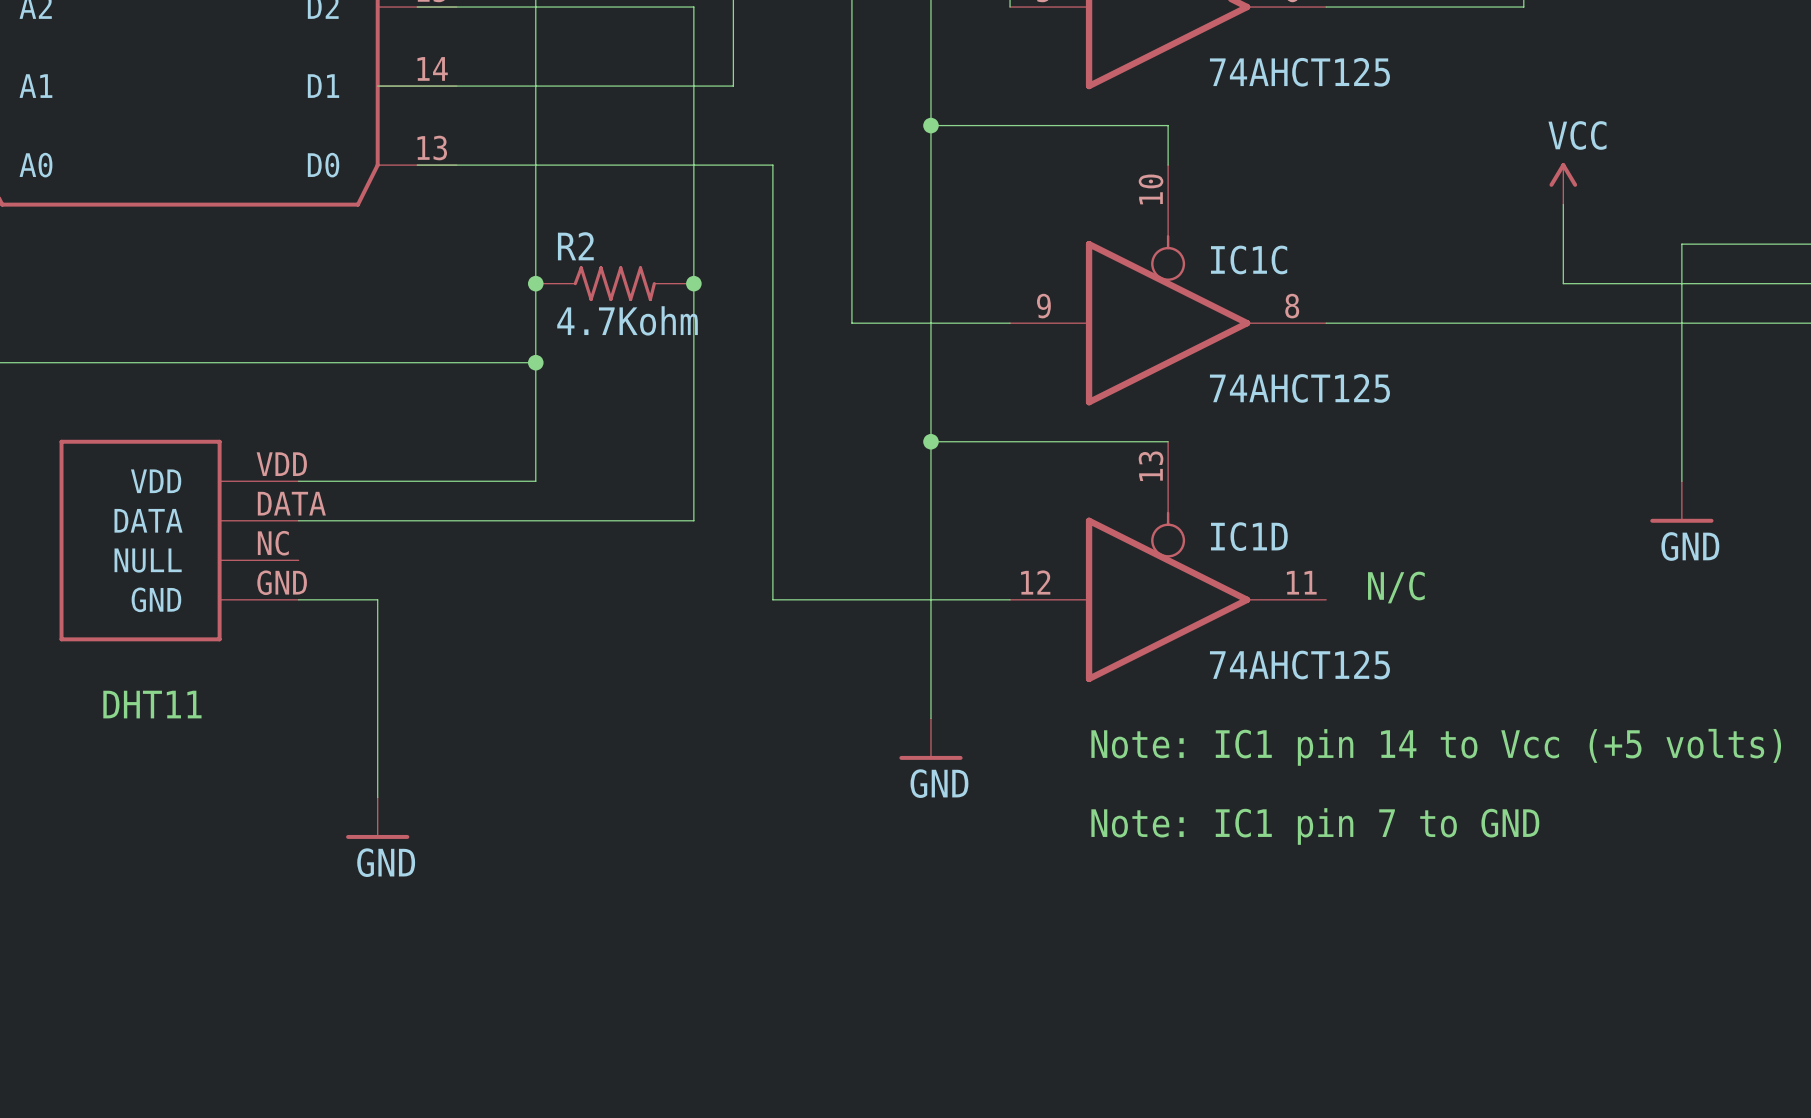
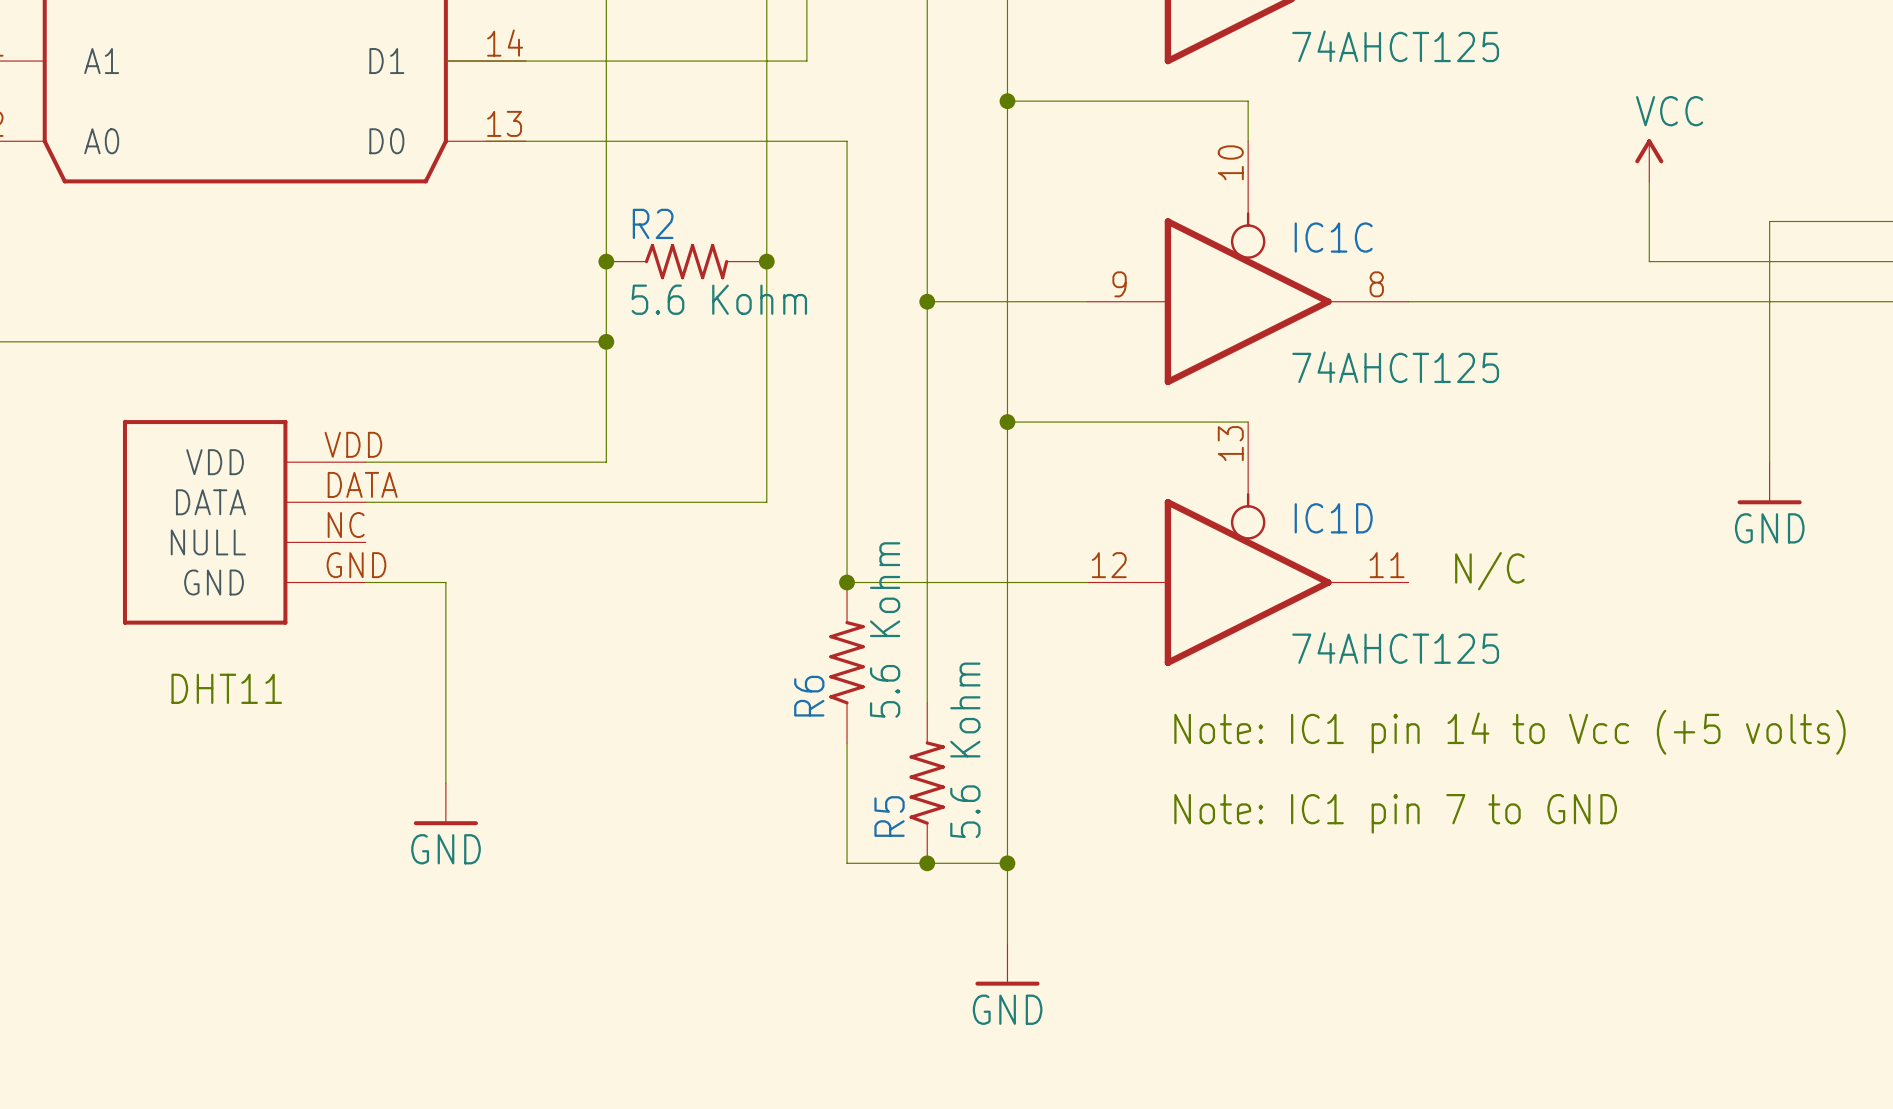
R2 value: 4.7Kohm (627, 320) -> 5.6 Kohm (719, 299)
wire: none -> (927, 301) (927, 702)
junction: none -> (927, 301)
junction: none -> (847, 582)
R6: none -> 5.6 Kohm (847, 662)
wire: none -> (1007, 702) (1007, 943)
power symbol position: GND (930, 739) -> GND (1007, 964)
wire: none -> (847, 742) (847, 863) (1007, 863)
R5: none -> 5.6 Kohm (927, 783)
junction: none -> (927, 863)
junction: none -> (1007, 863)

